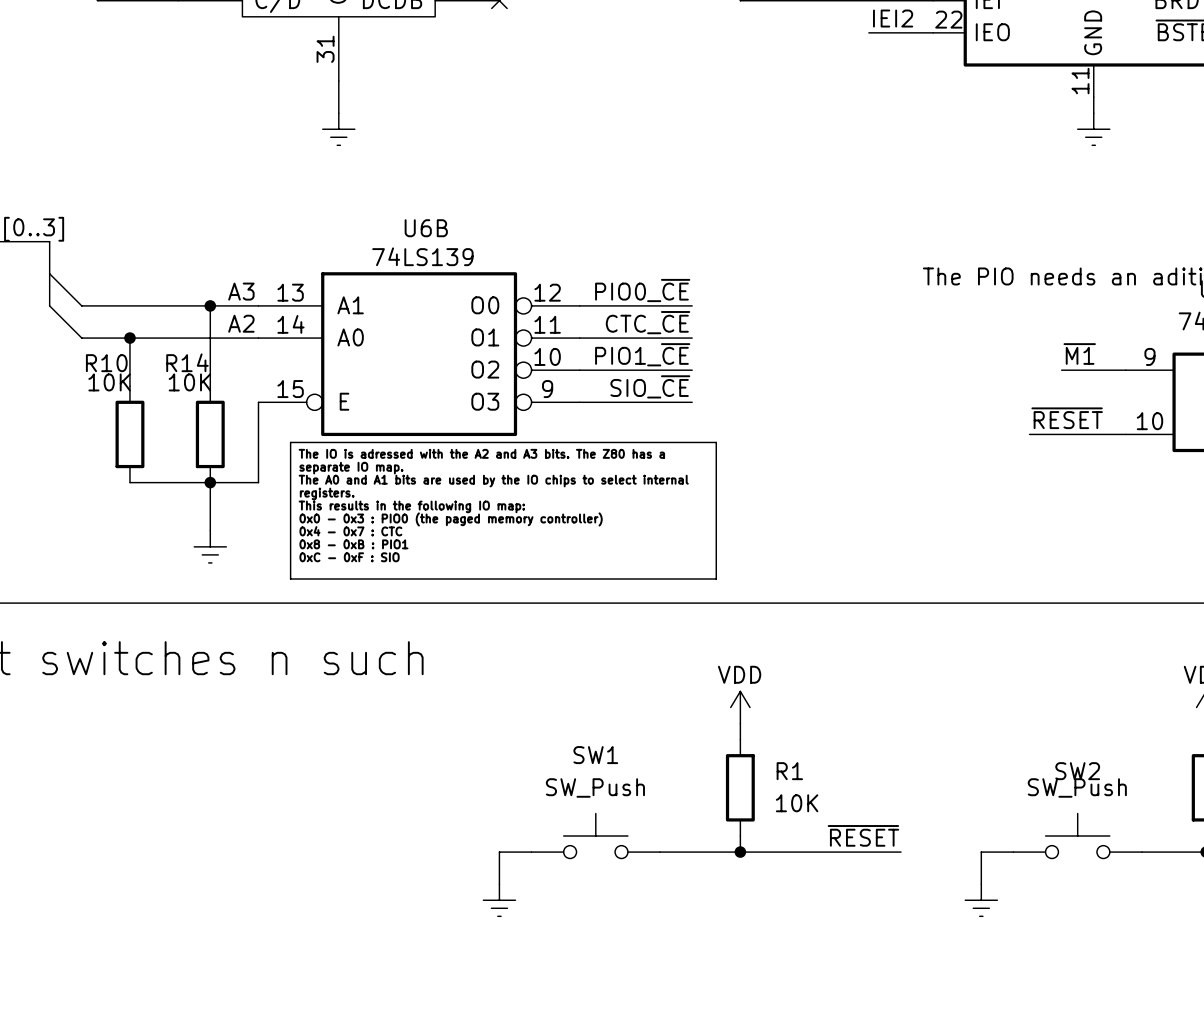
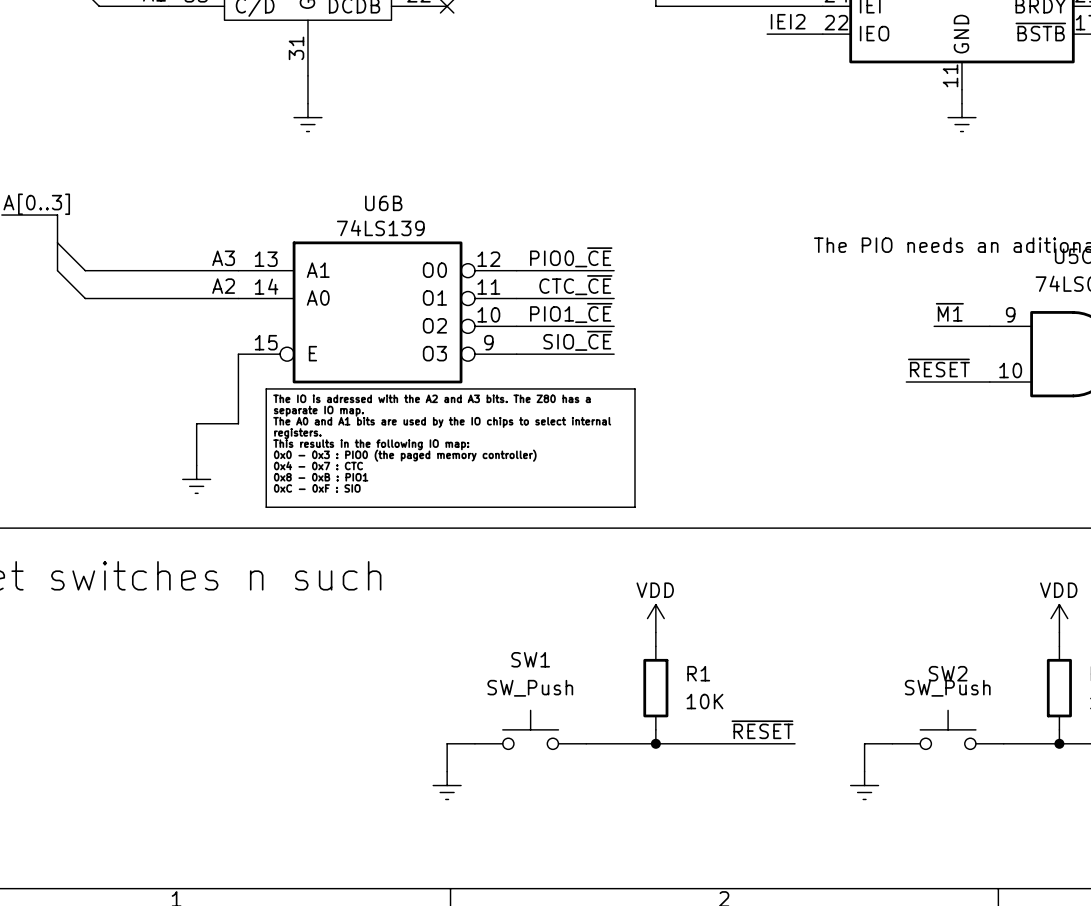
wire: (210, 305) (210, 386) -> none
junction: (210, 305) -> none
wire: (129, 338) (129, 386) -> none
junction: (129, 338) -> none
R10: 10K (129, 434) -> none
R14: 10K (210, 434) -> none
wire: (129, 482) (210, 482) -> none
junction: (210, 482) -> none

